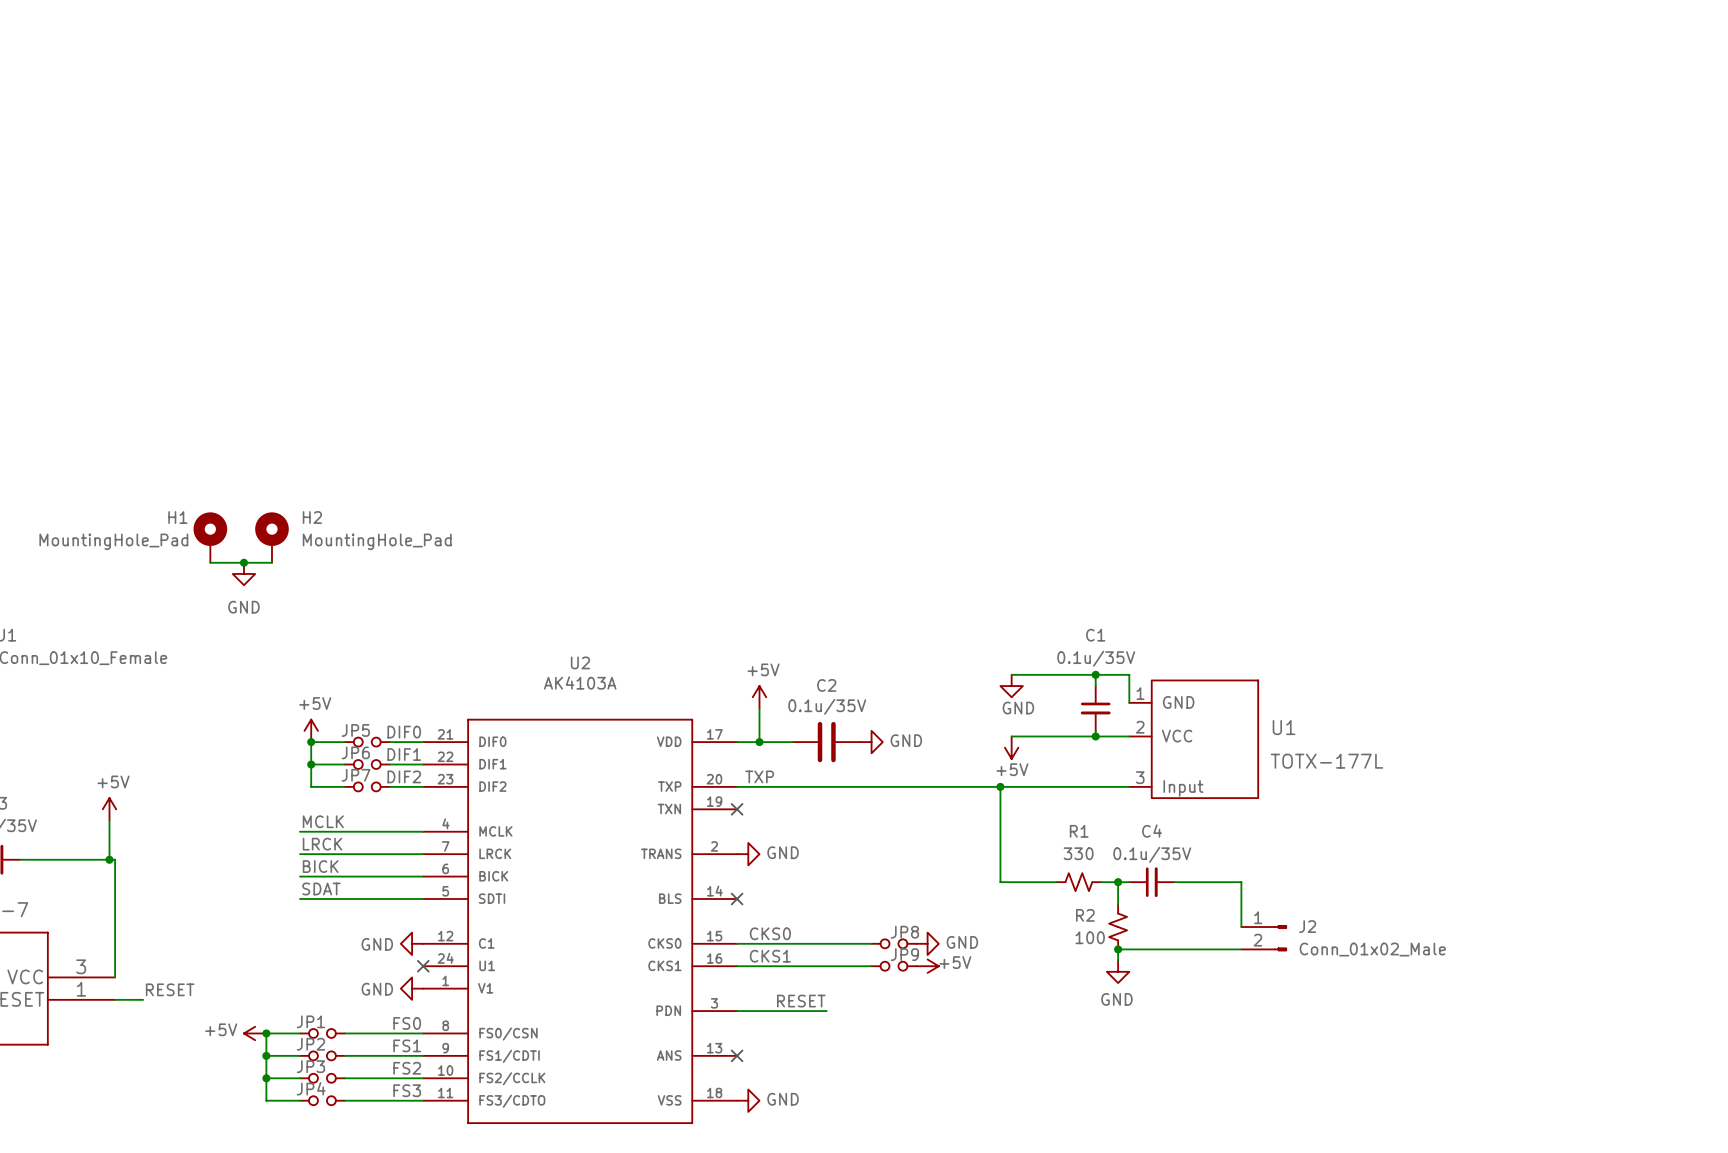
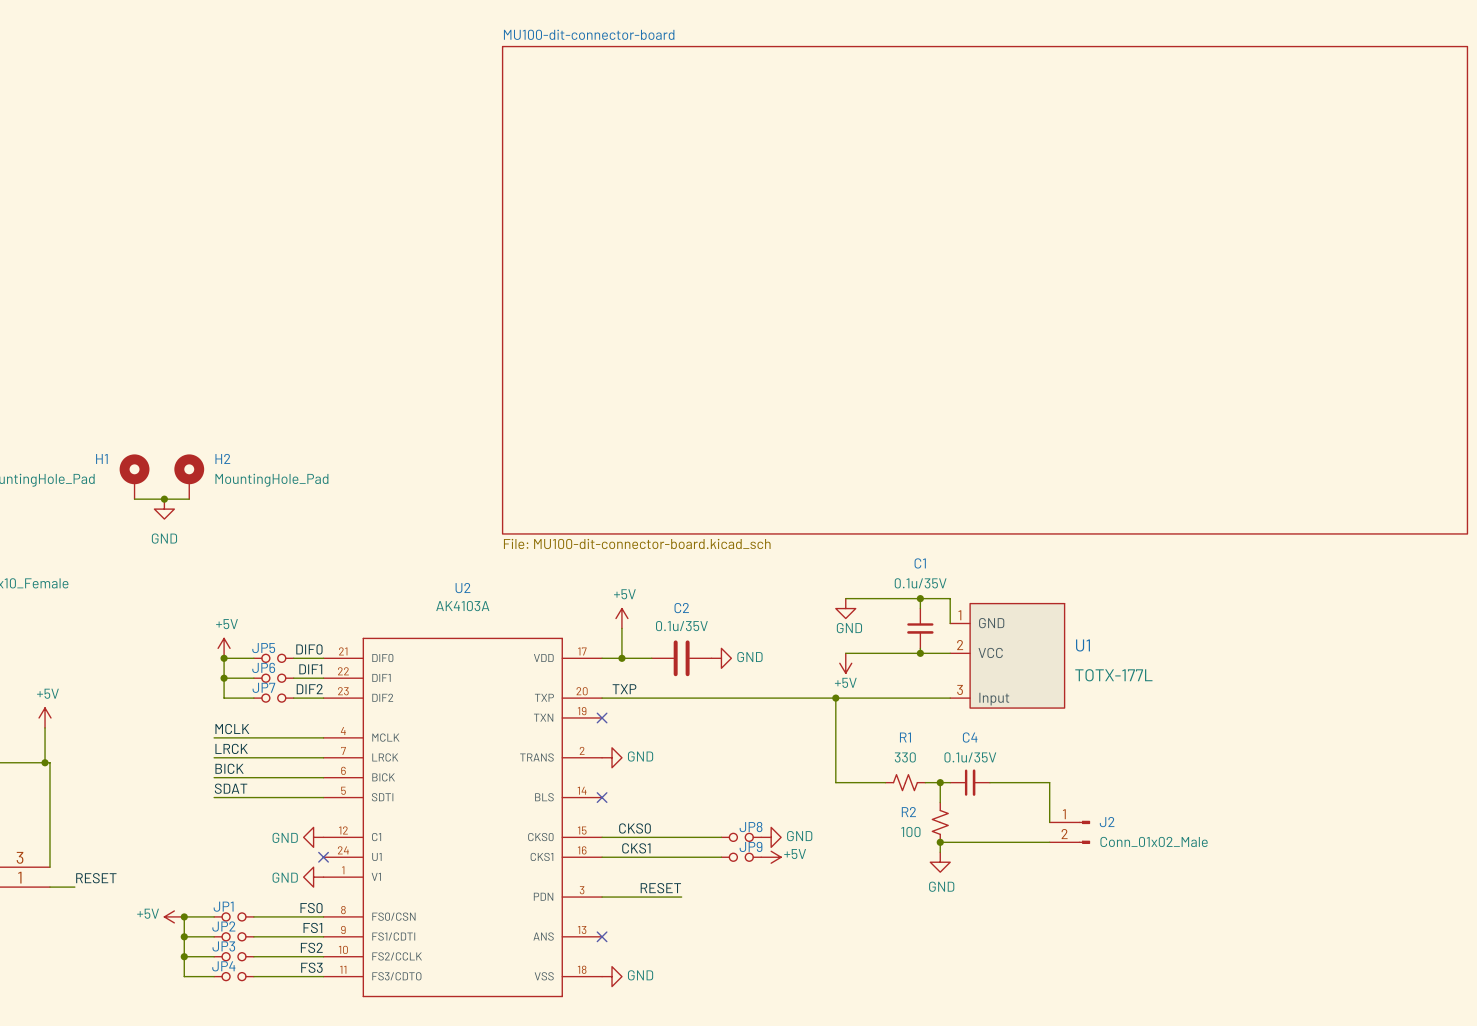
sheet MU100-dit-connector-board: none -> File: MU100-dit-connector-board.kicad_sch (985, 290)

